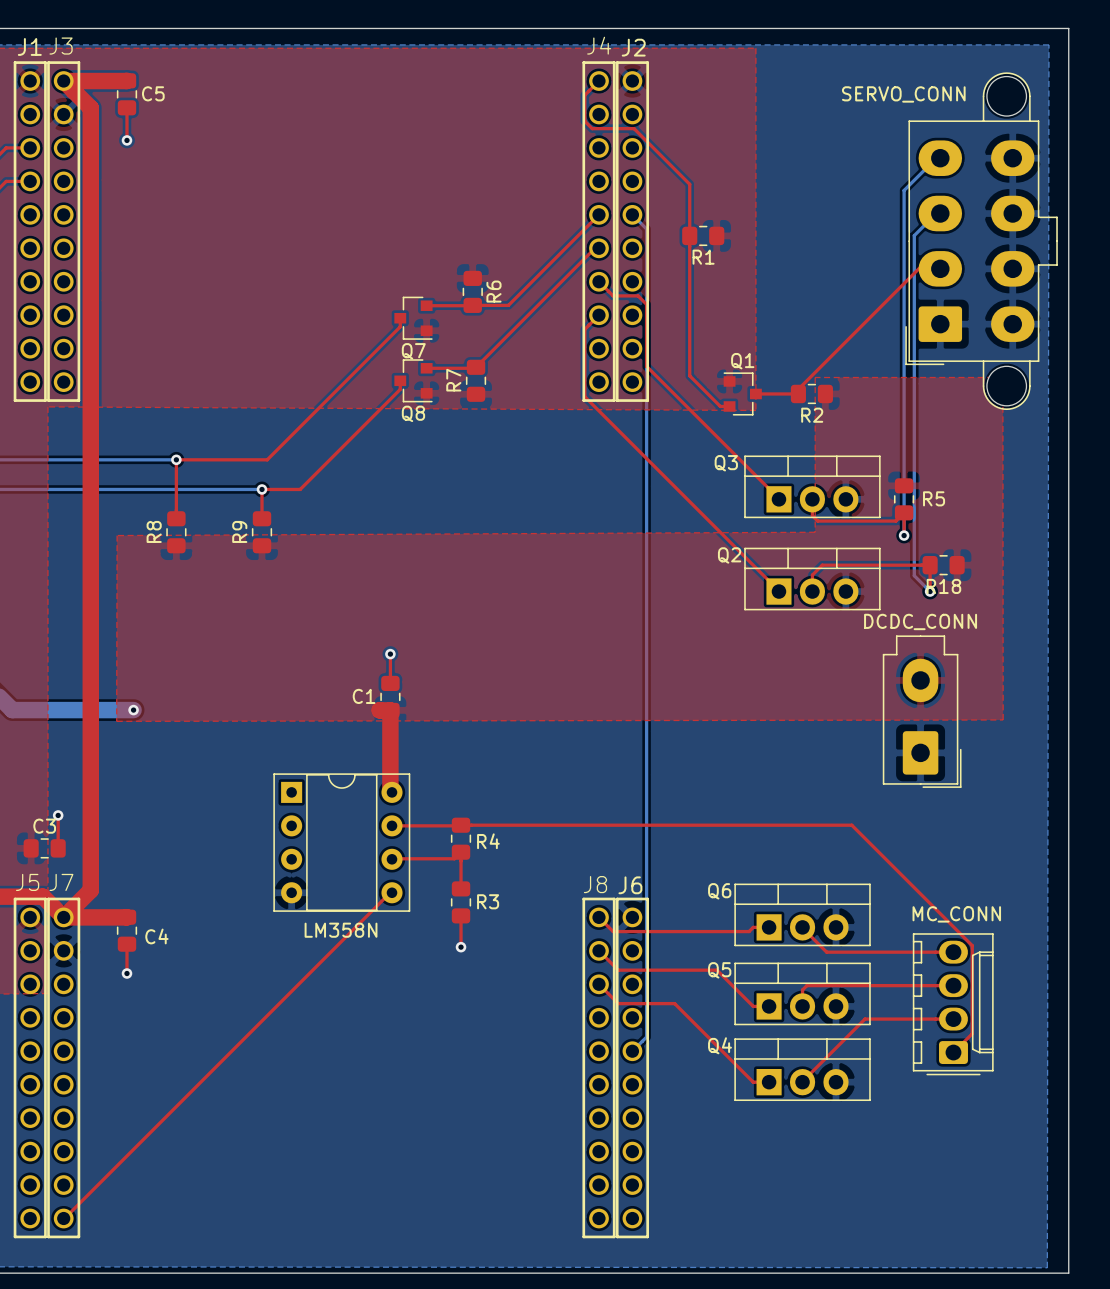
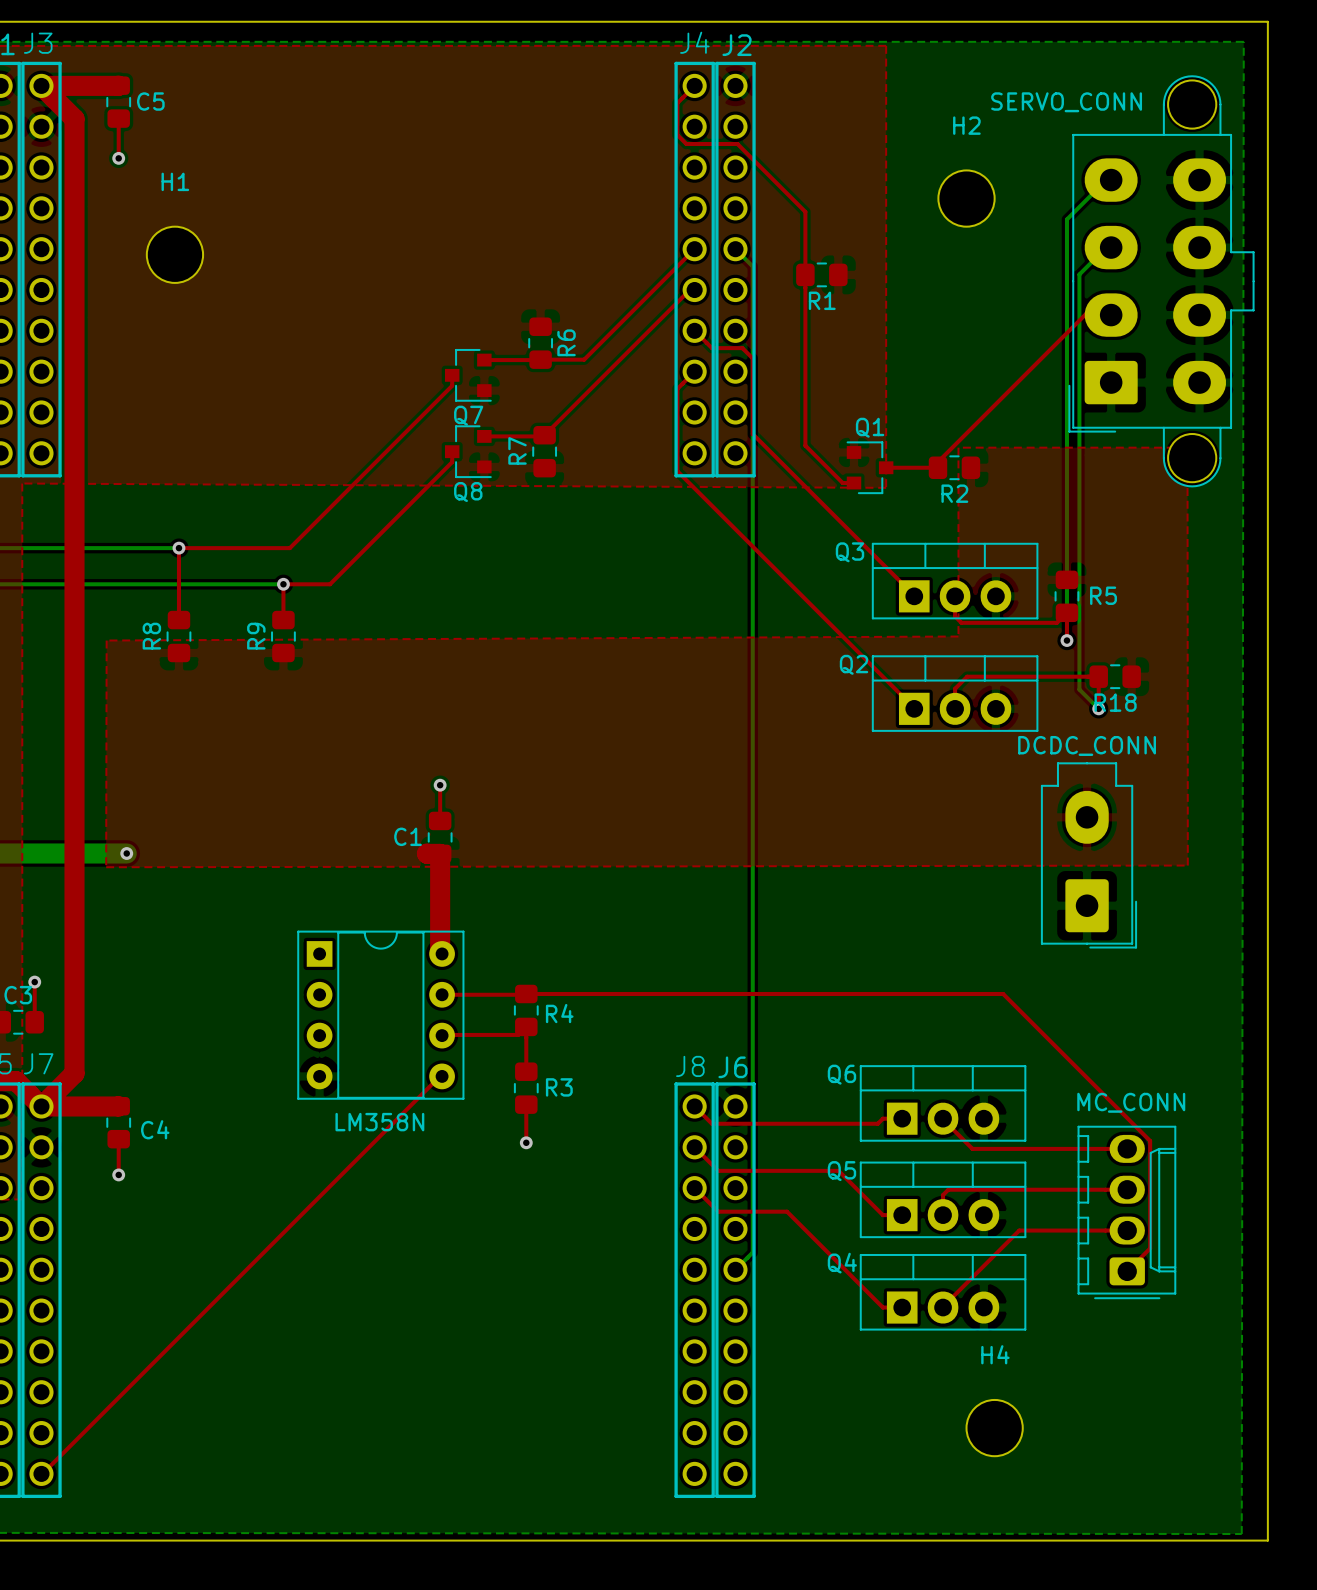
H2: none -> (966, 198)
H1: none -> (174, 254)
H4: none -> (994, 1428)

